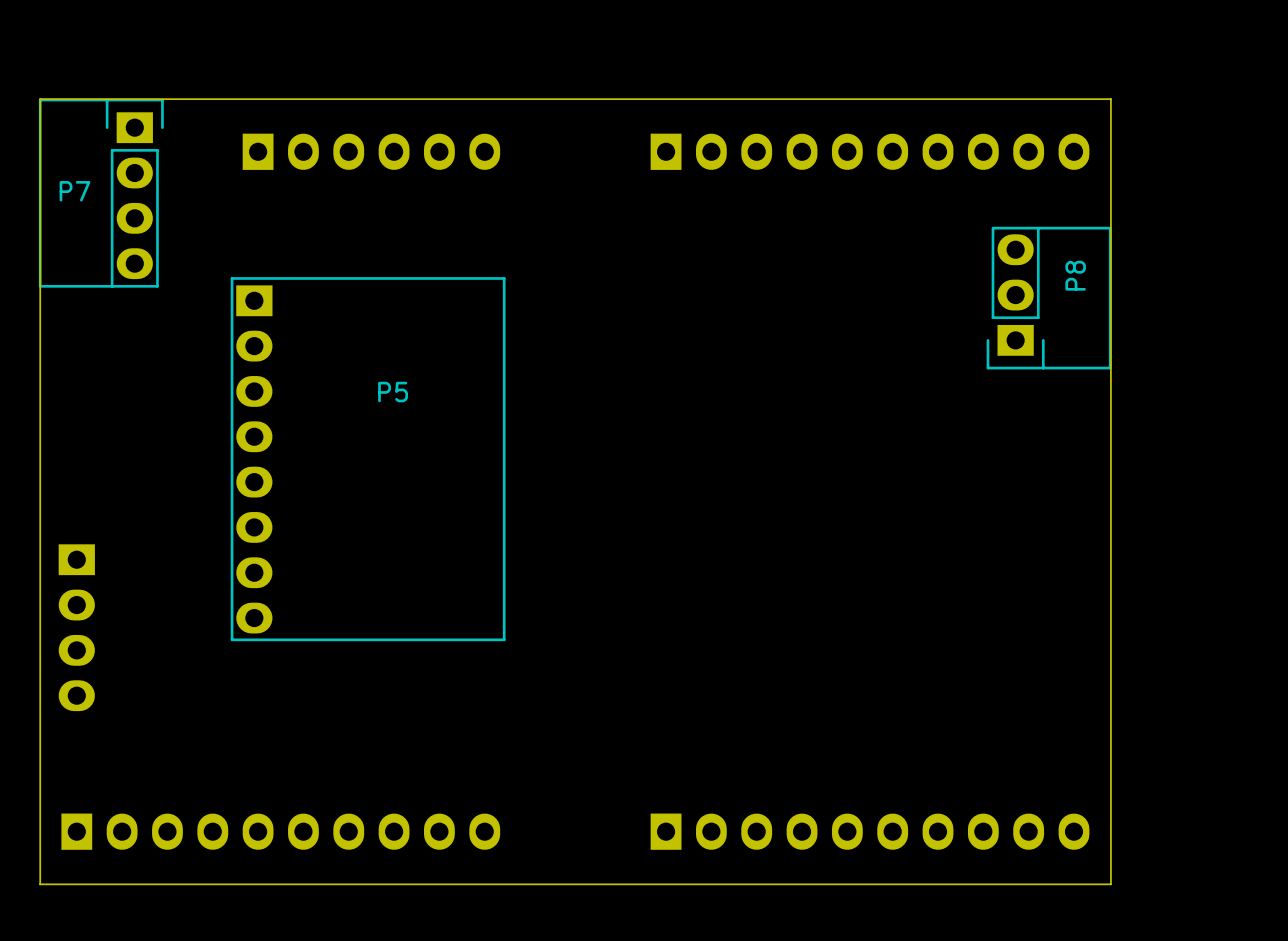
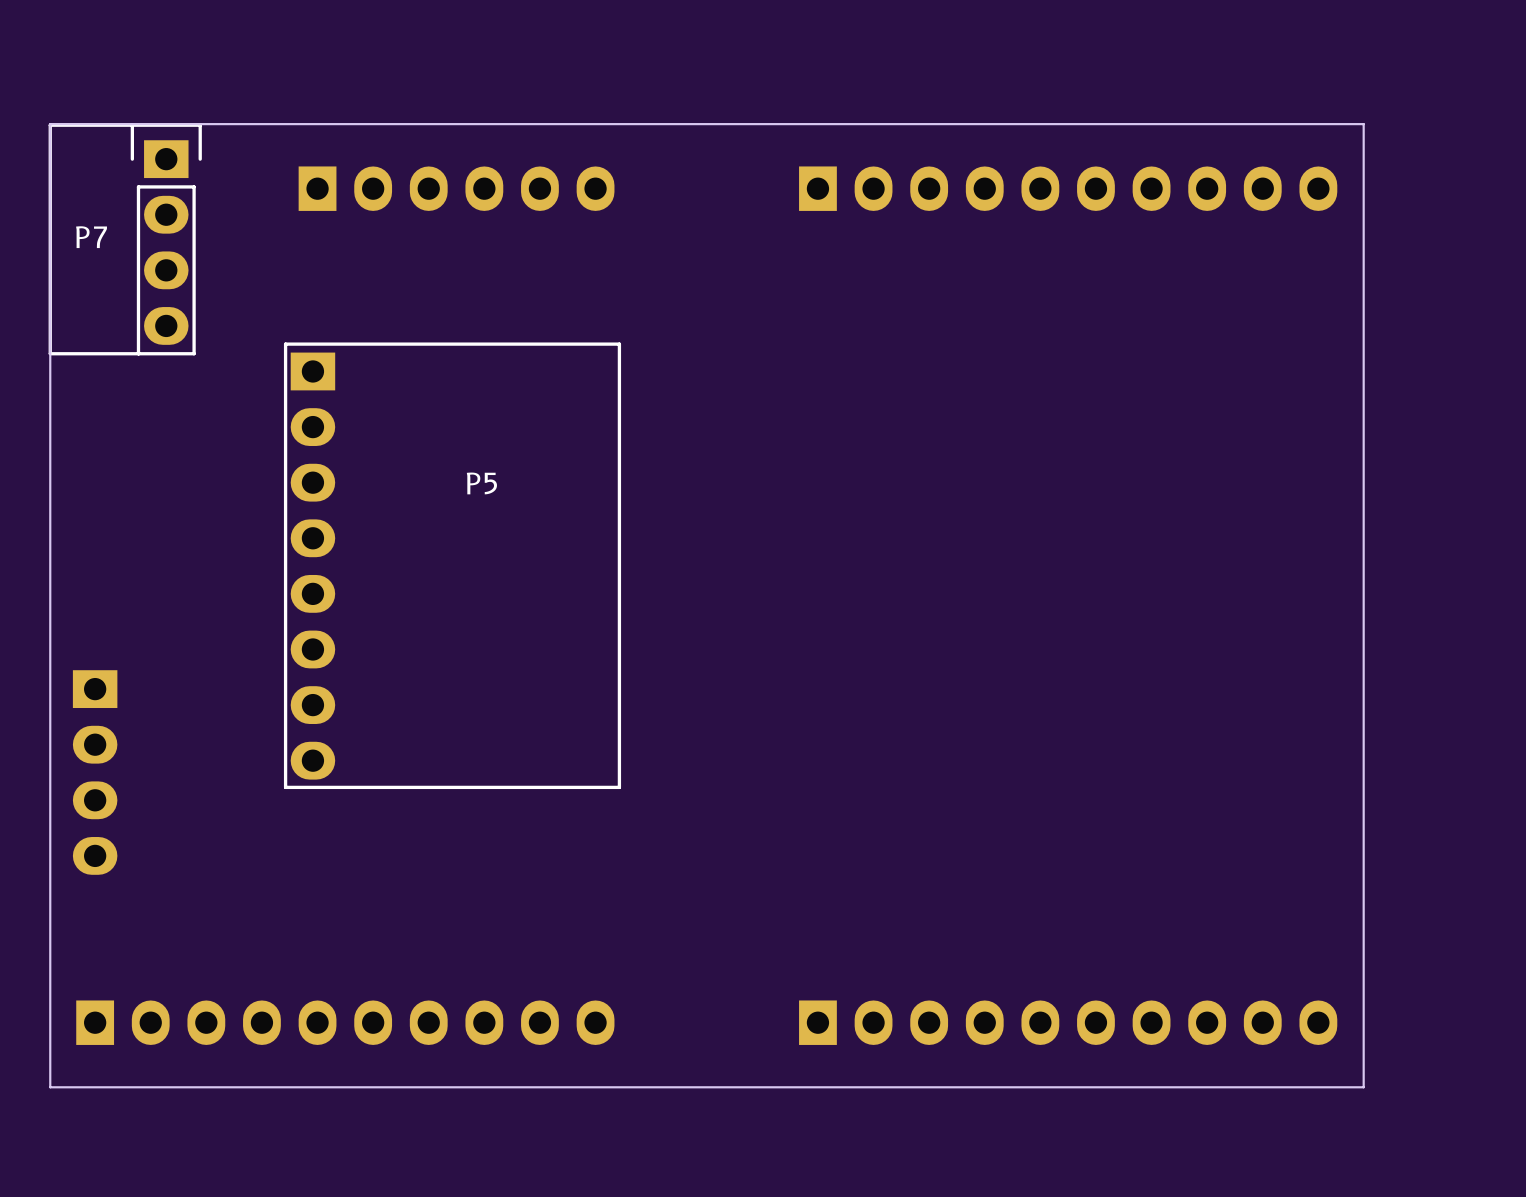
P8: (1049, 298) -> none

